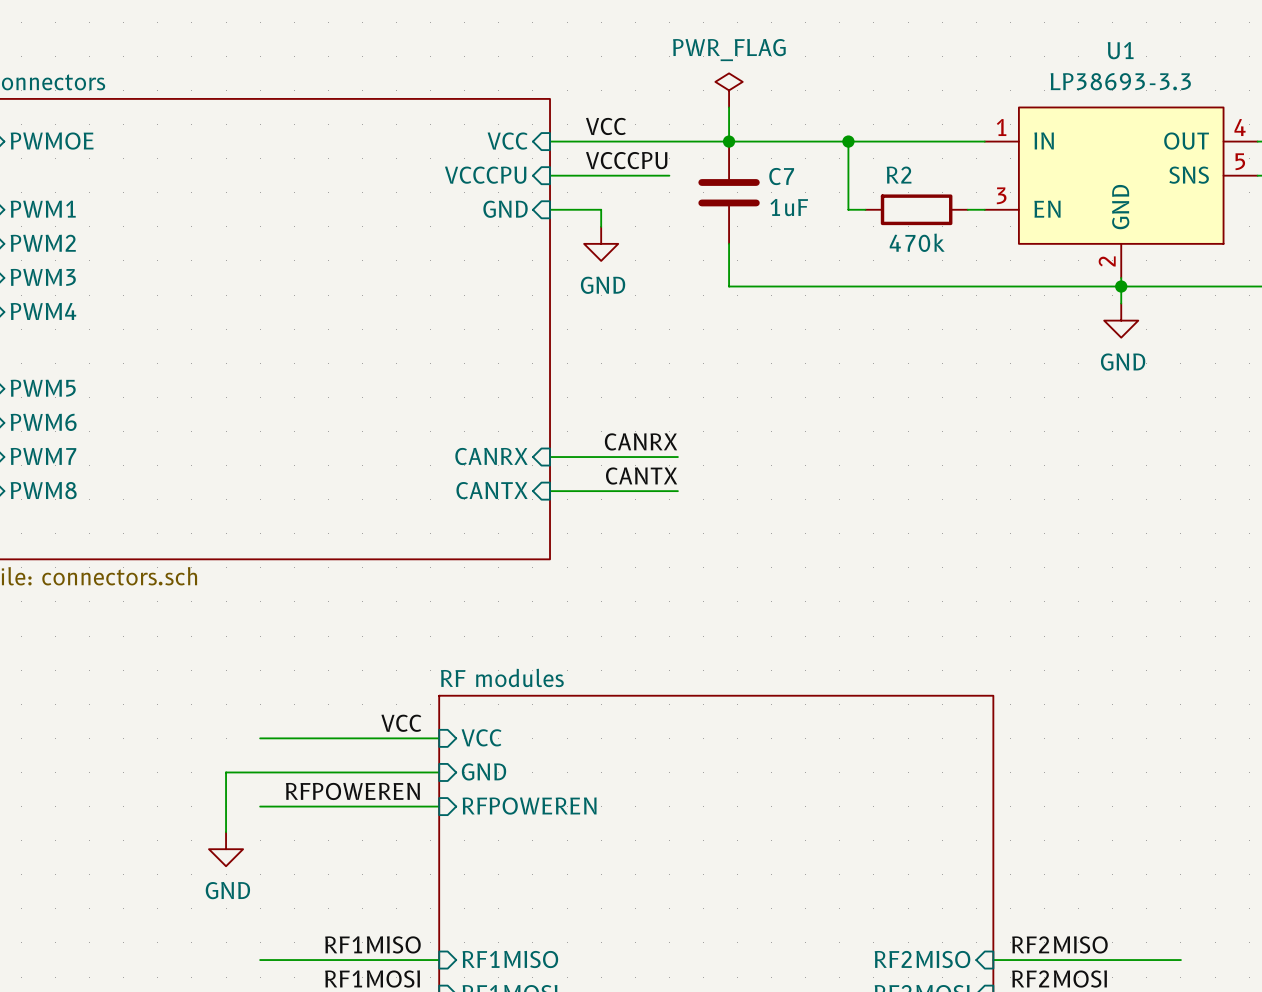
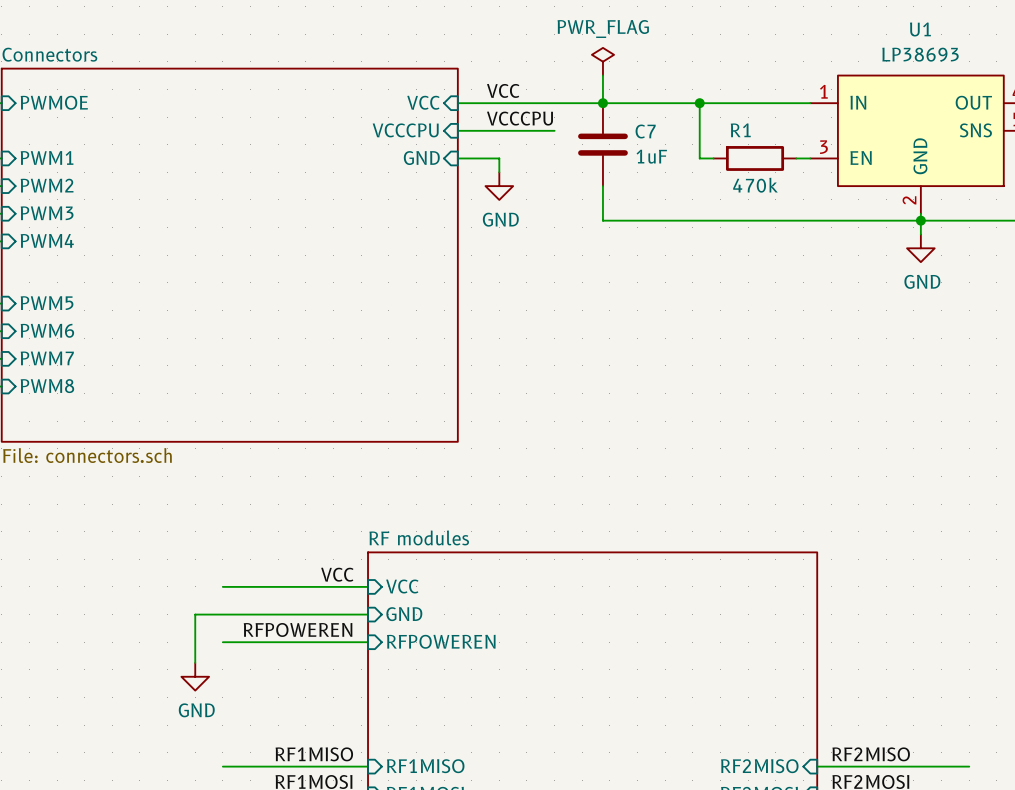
U1 value: LP38693-3.3 (1120, 81) -> LP38693 (920, 54)
R2 name: R2 (899, 175) -> R1 (740, 130)
label: CANRX (641, 441) -> none
sheet pin: CANRX (491, 456) -> none
wire: (550, 457) (677, 457) -> none
label: CANTX (641, 476) -> none
sheet pin: CANTX (492, 490) -> none
wire: (550, 491) (677, 491) -> none

